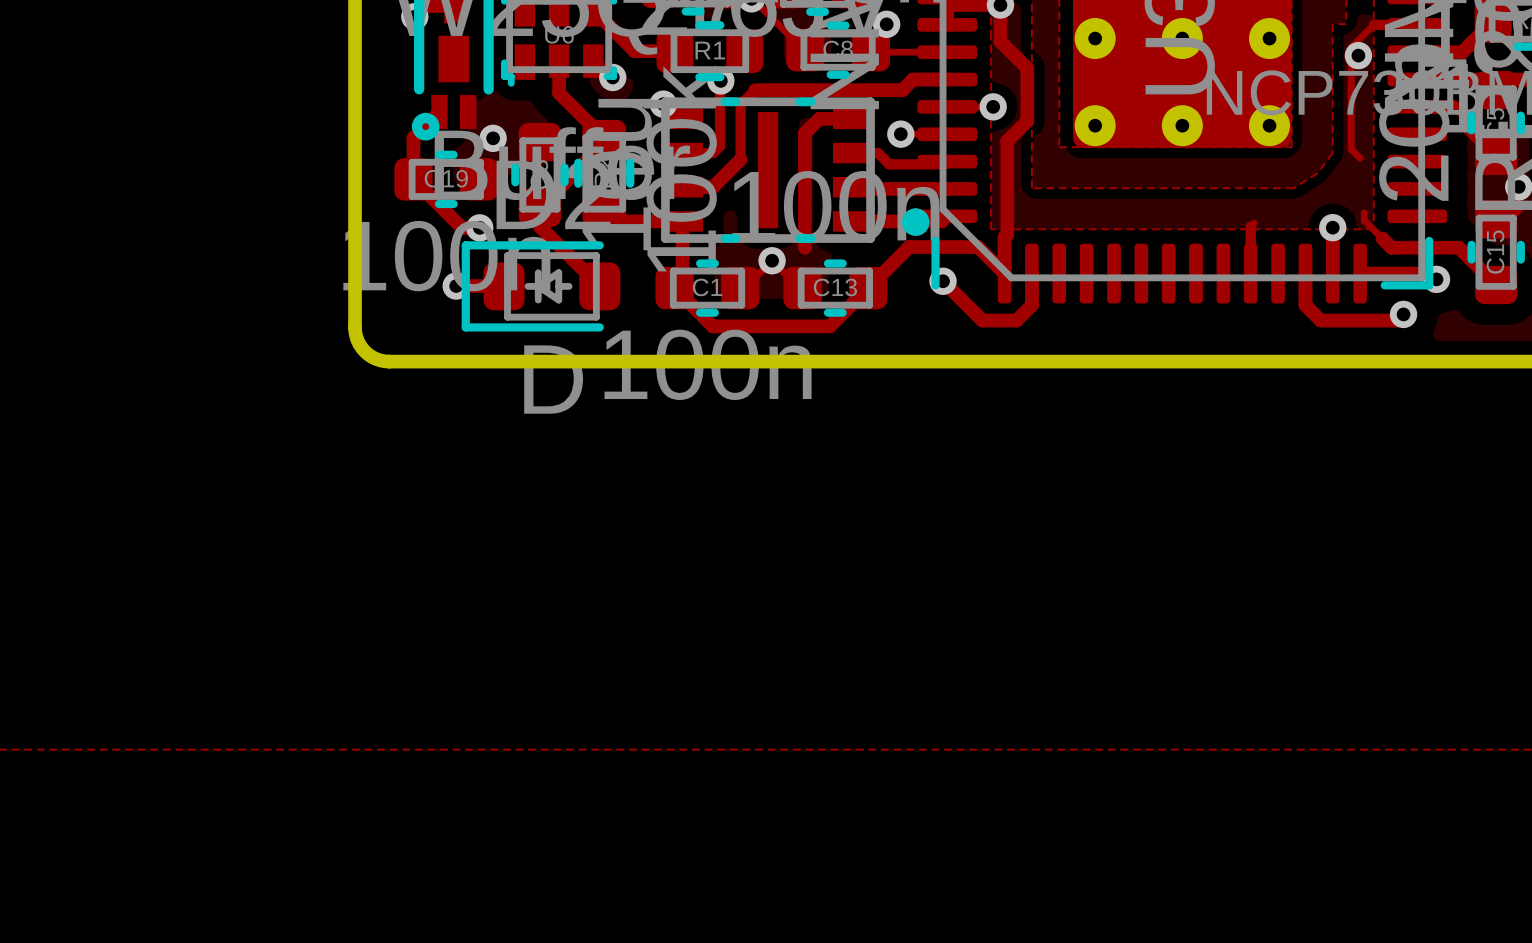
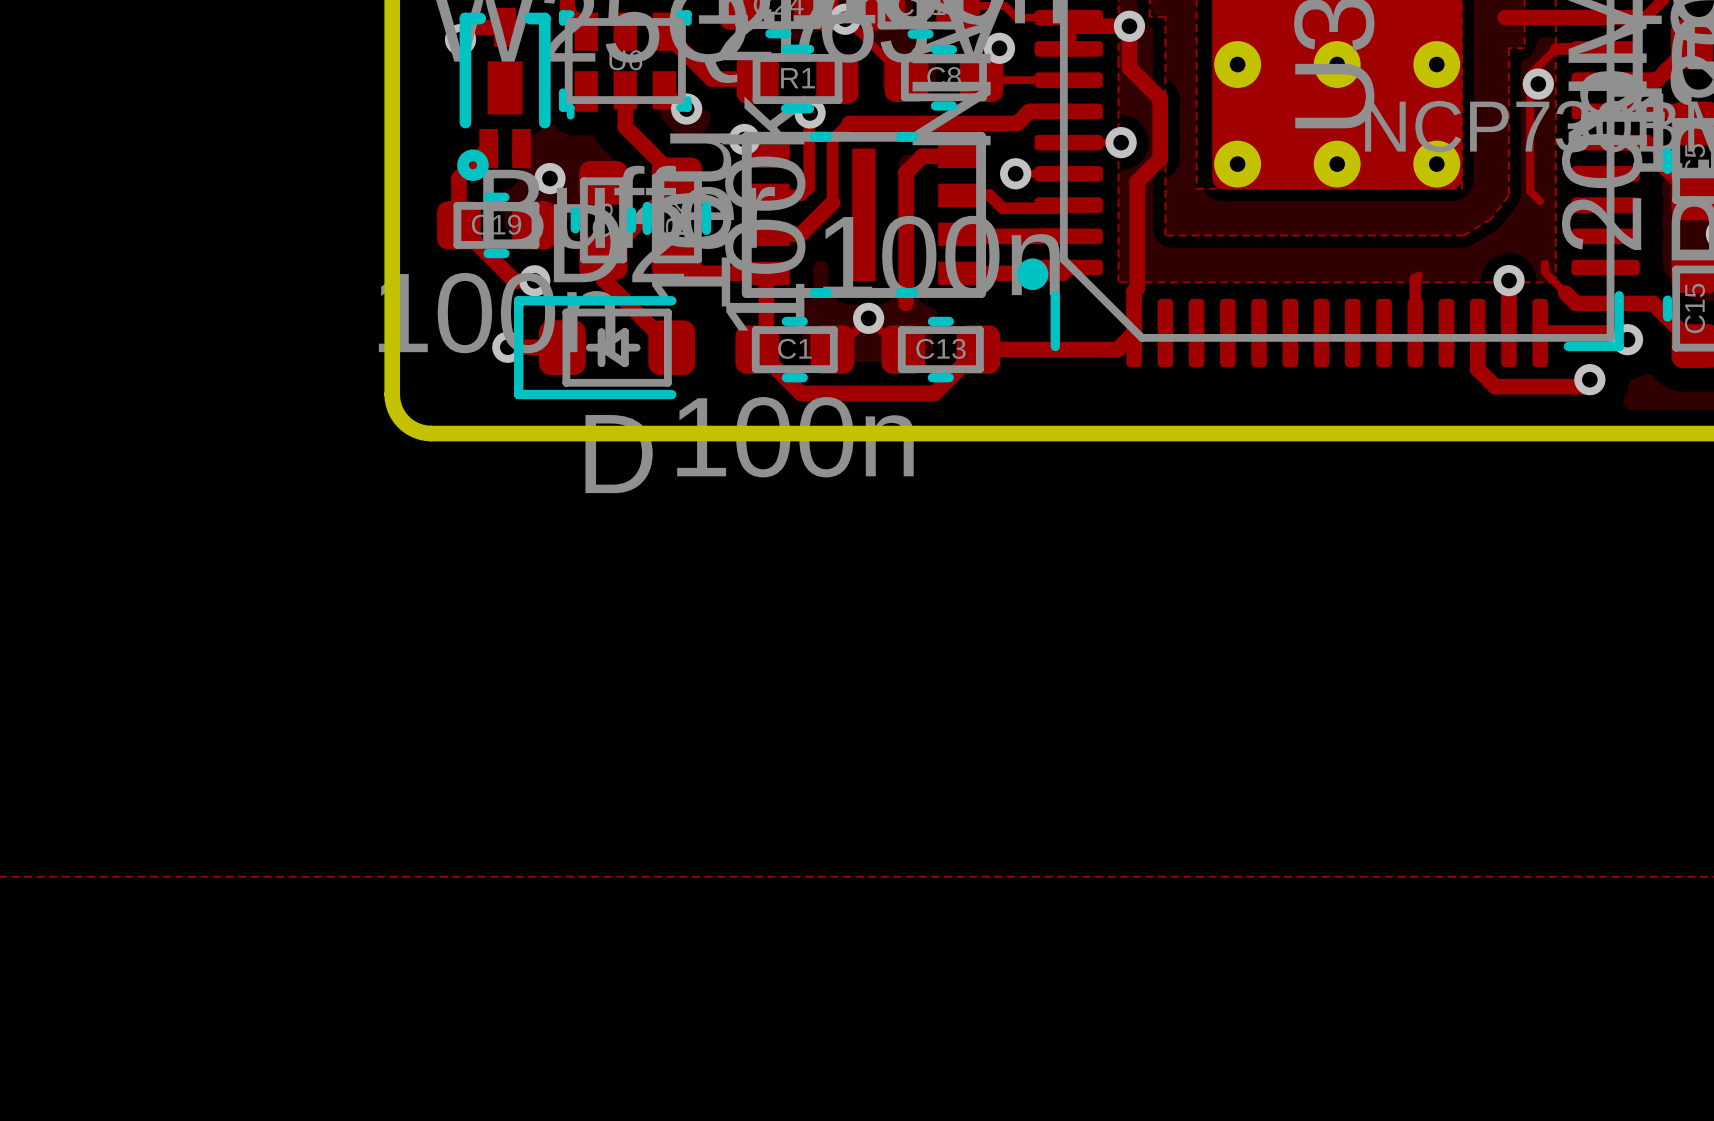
track: (1004, 273) (978, 247) (909, 247) (868, 288) -> (1134, 333) (1117, 349) (978, 349)
track: (1031, 273) (1031, 305) (1016, 320) (982, 320) (943, 281) -> none
via: (943, 281) -> none

